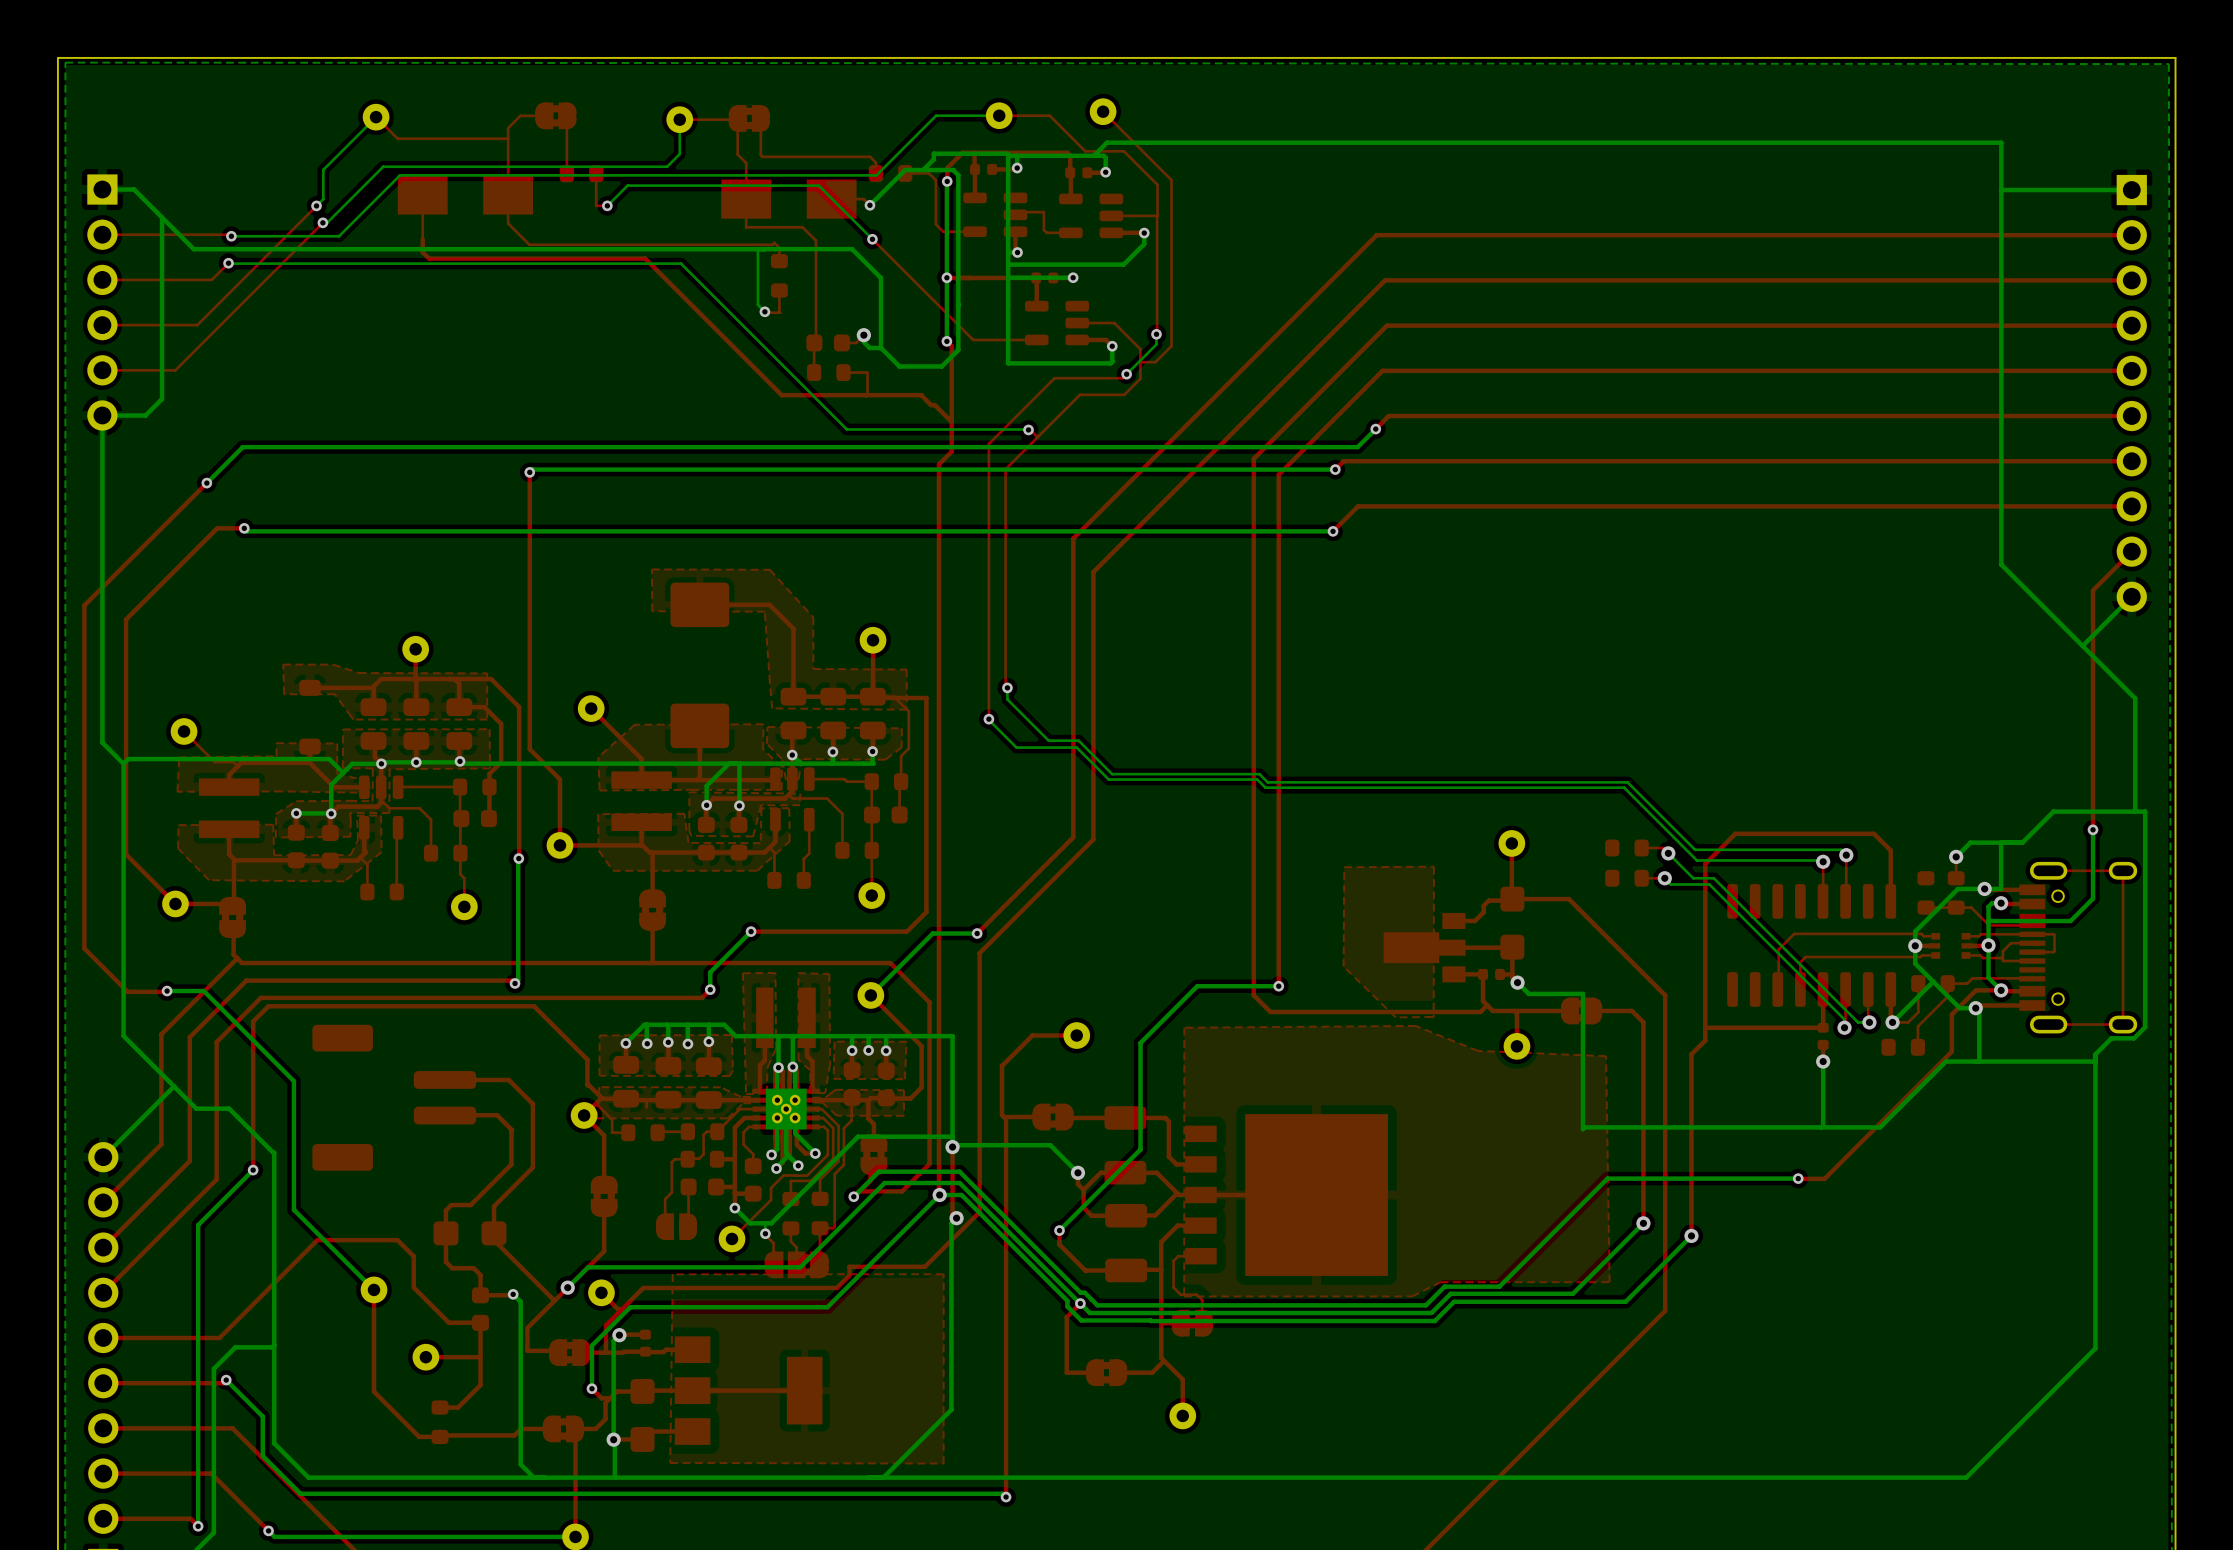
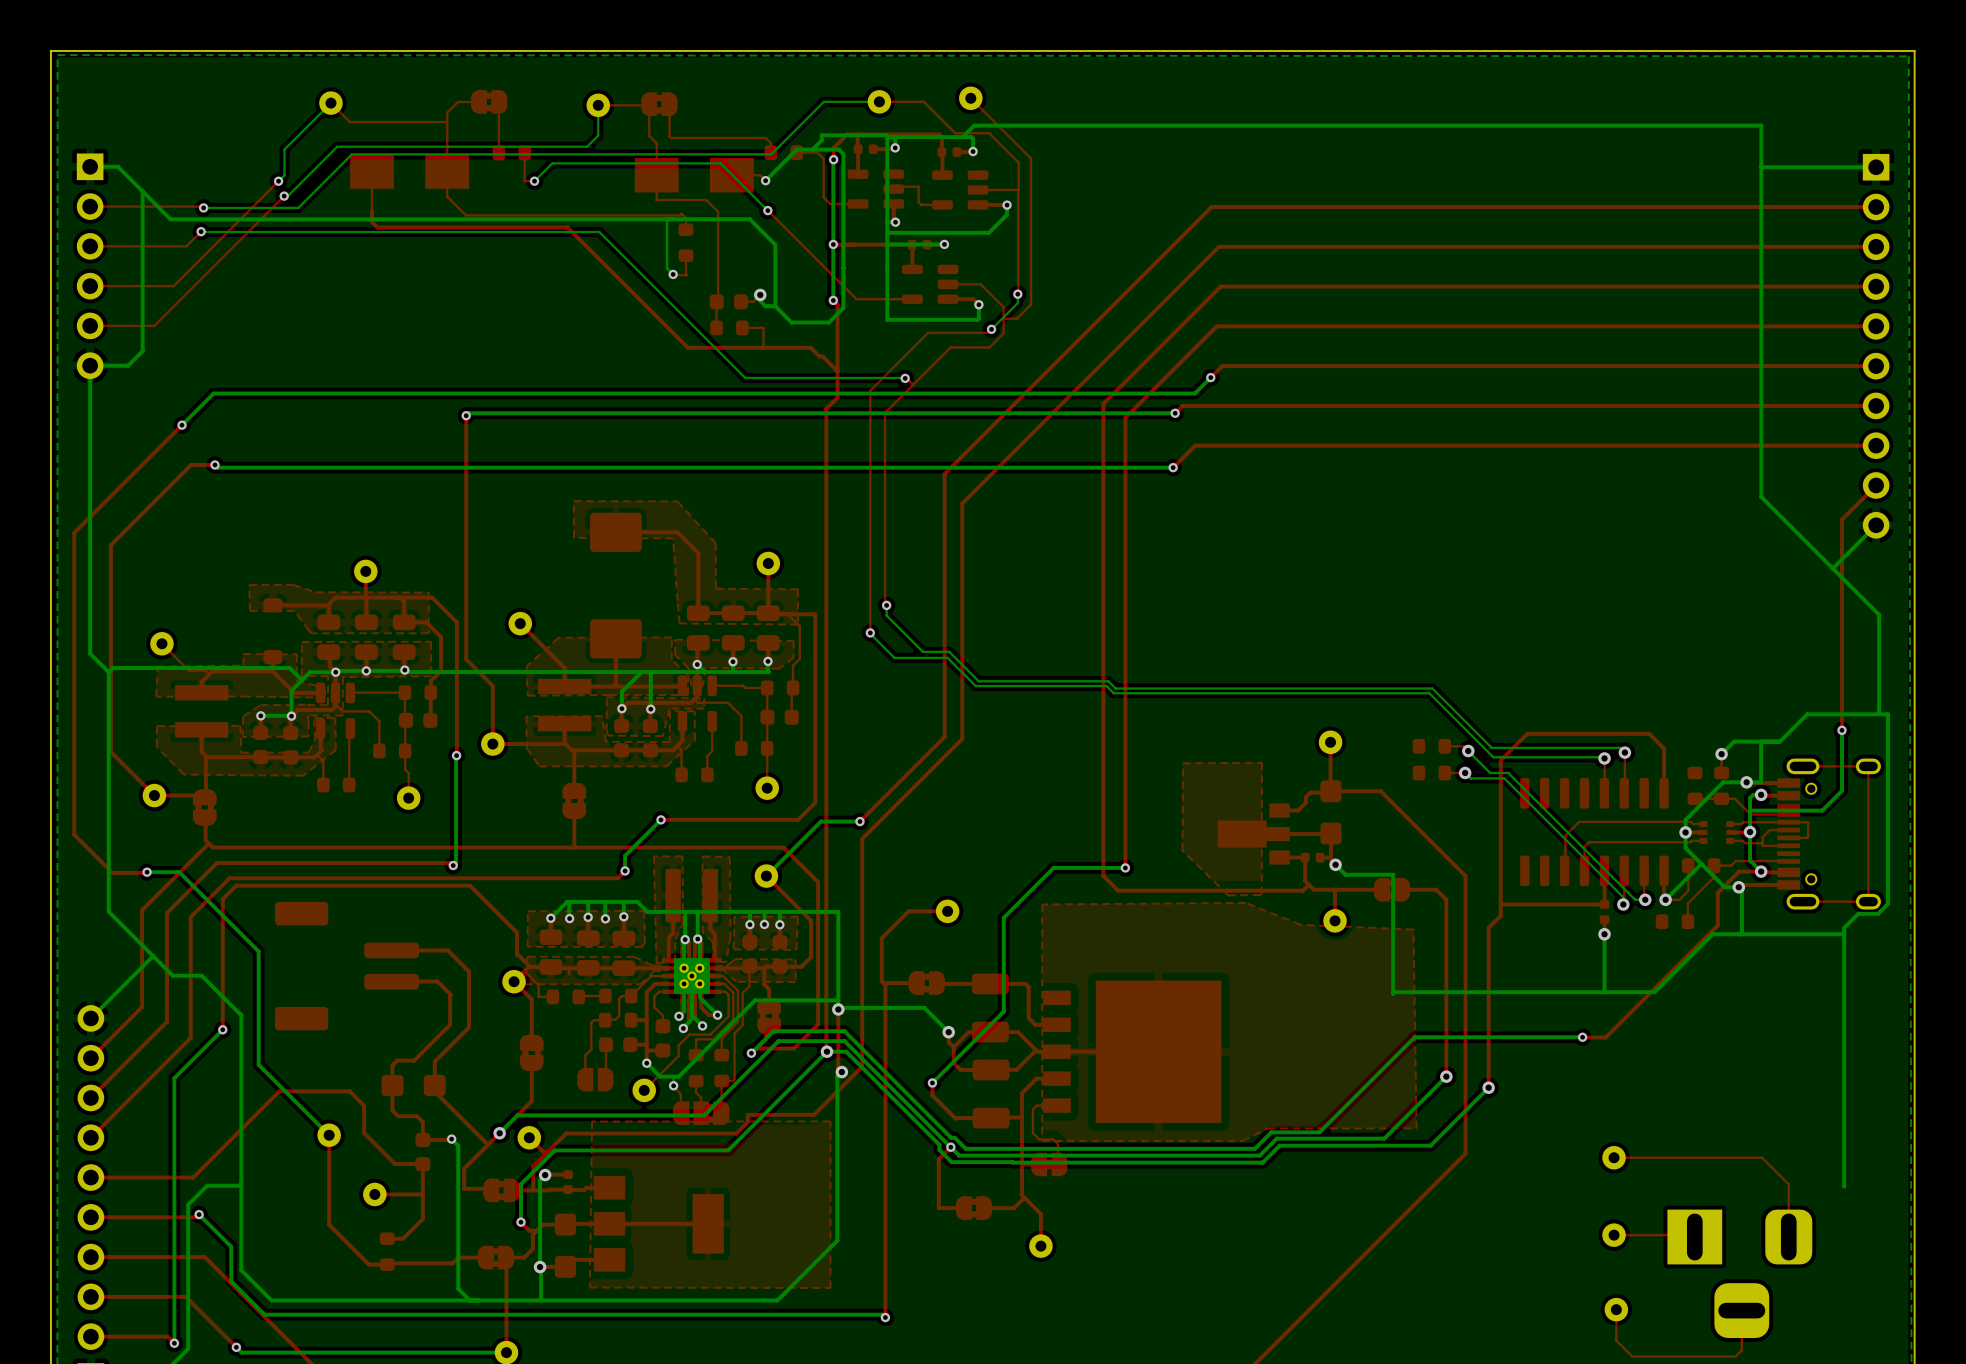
top track: none -> (1614, 1157) (1762, 1157) (1788, 1184) (1788, 1237)
part: none -> (1614, 1157)
bottom track: (2095, 1348) (1966, 1477) (883, 1477) -> none
top track: none -> (1614, 1235) (1692, 1235) (1694, 1237)
part: none -> (1614, 1235)
part: none -> (1739, 1273)
top track: none -> (1616, 1309) (1616, 1340) (1632, 1356) (1735, 1356) (1741, 1350) (1741, 1310)
part: none -> (1616, 1309)

